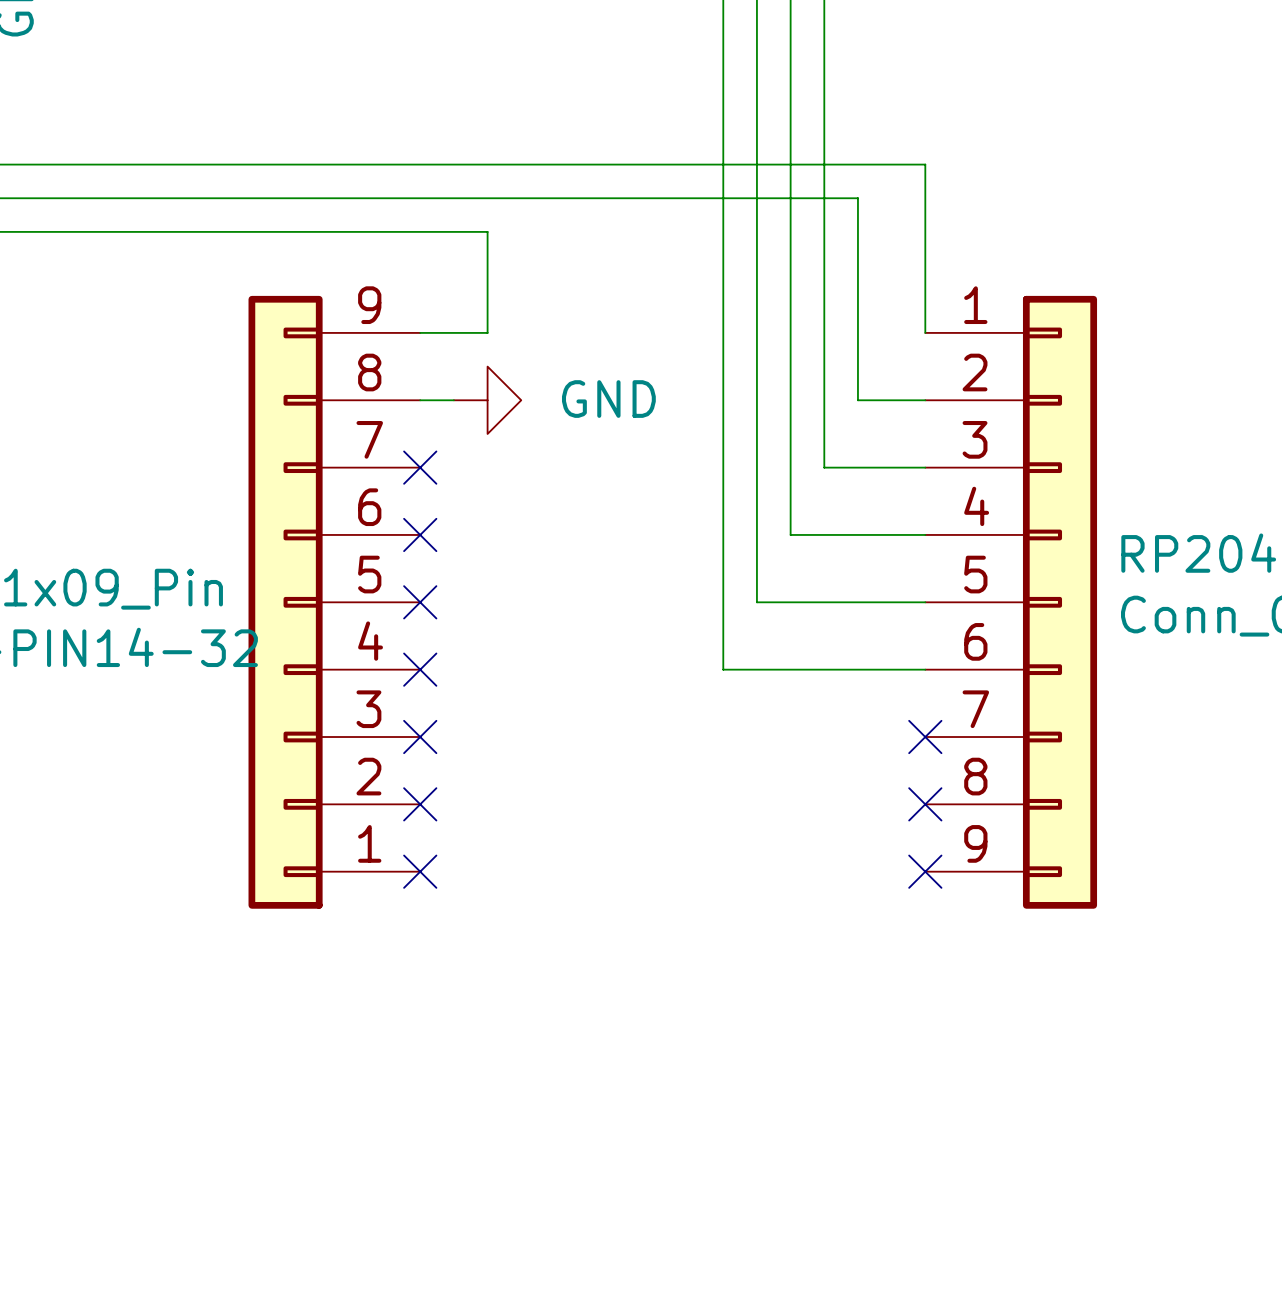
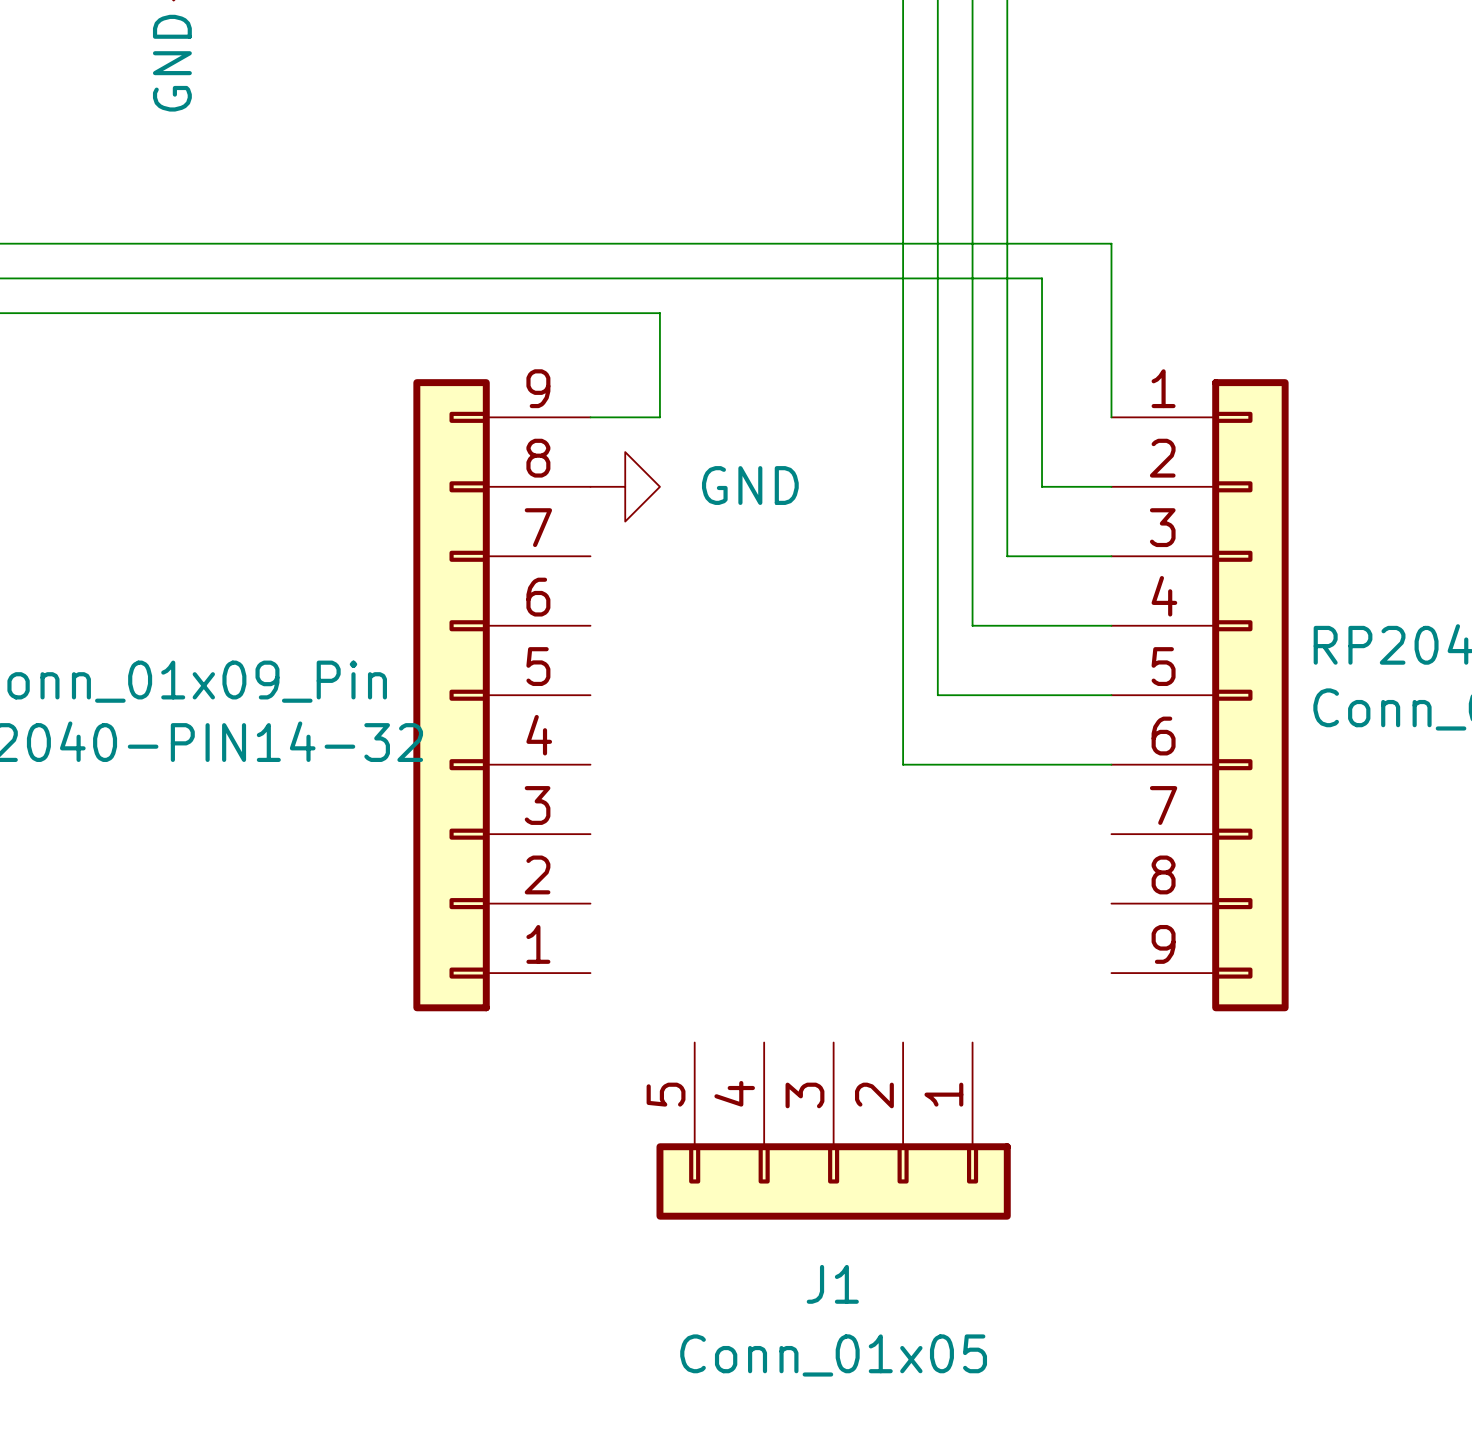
power symbol position: GND (487, 400) -> GND (625, 486)
no-connect mark: (420, 467) -> none
no-connect mark: (420, 534) -> none
no-connect mark: (420, 602) -> none
no-connect mark: (420, 669) -> none
no-connect mark: (420, 737) -> none
no-connect mark: (925, 737) -> none
no-connect mark: (420, 804) -> none
no-connect mark: (925, 804) -> none
no-connect mark: (420, 871) -> none
no-connect mark: (925, 871) -> none
J1: none -> Conn_01x05 (833, 1131)

